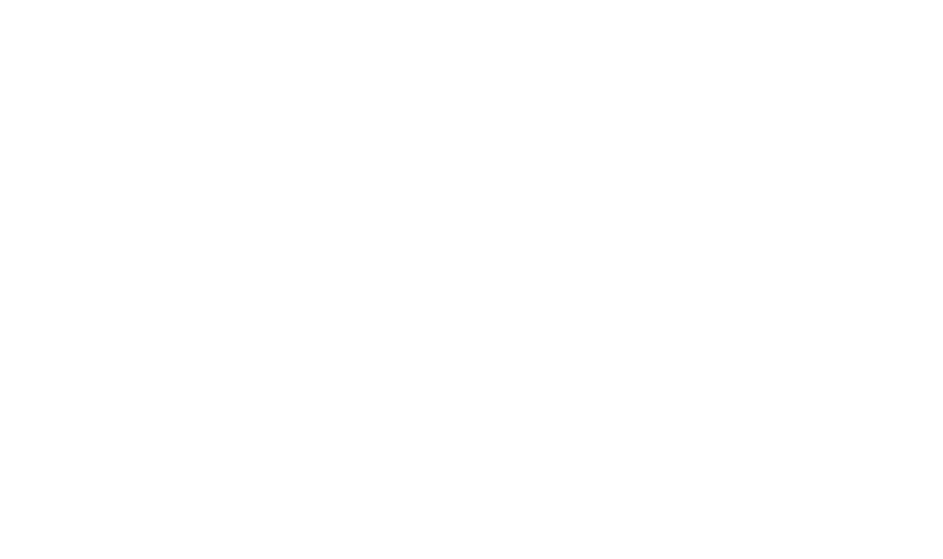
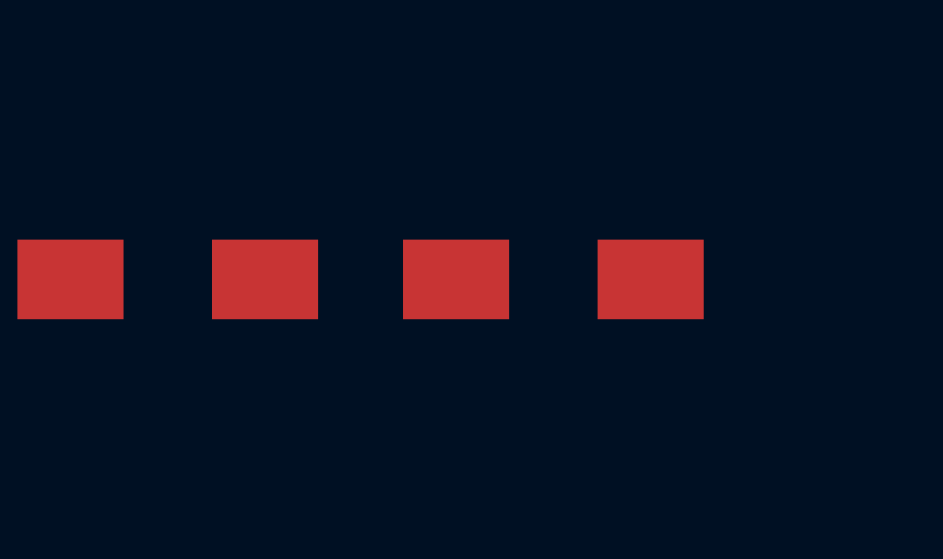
part: none -> (167, 279)
part: none -> (553, 279)

